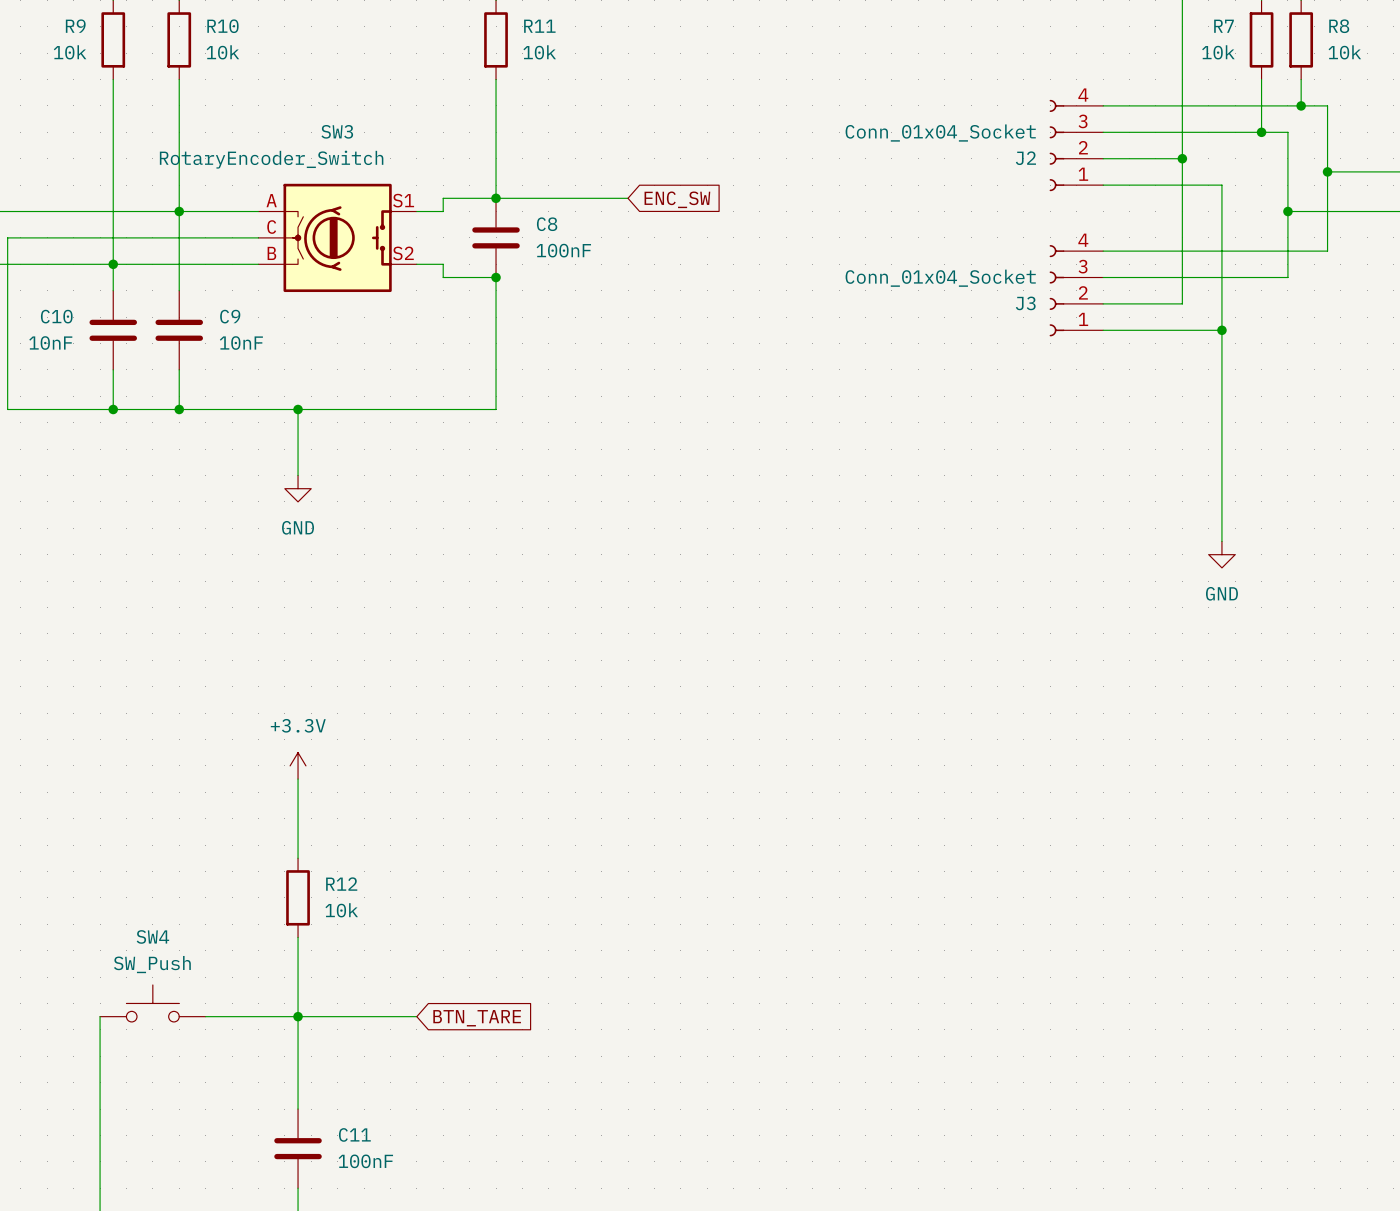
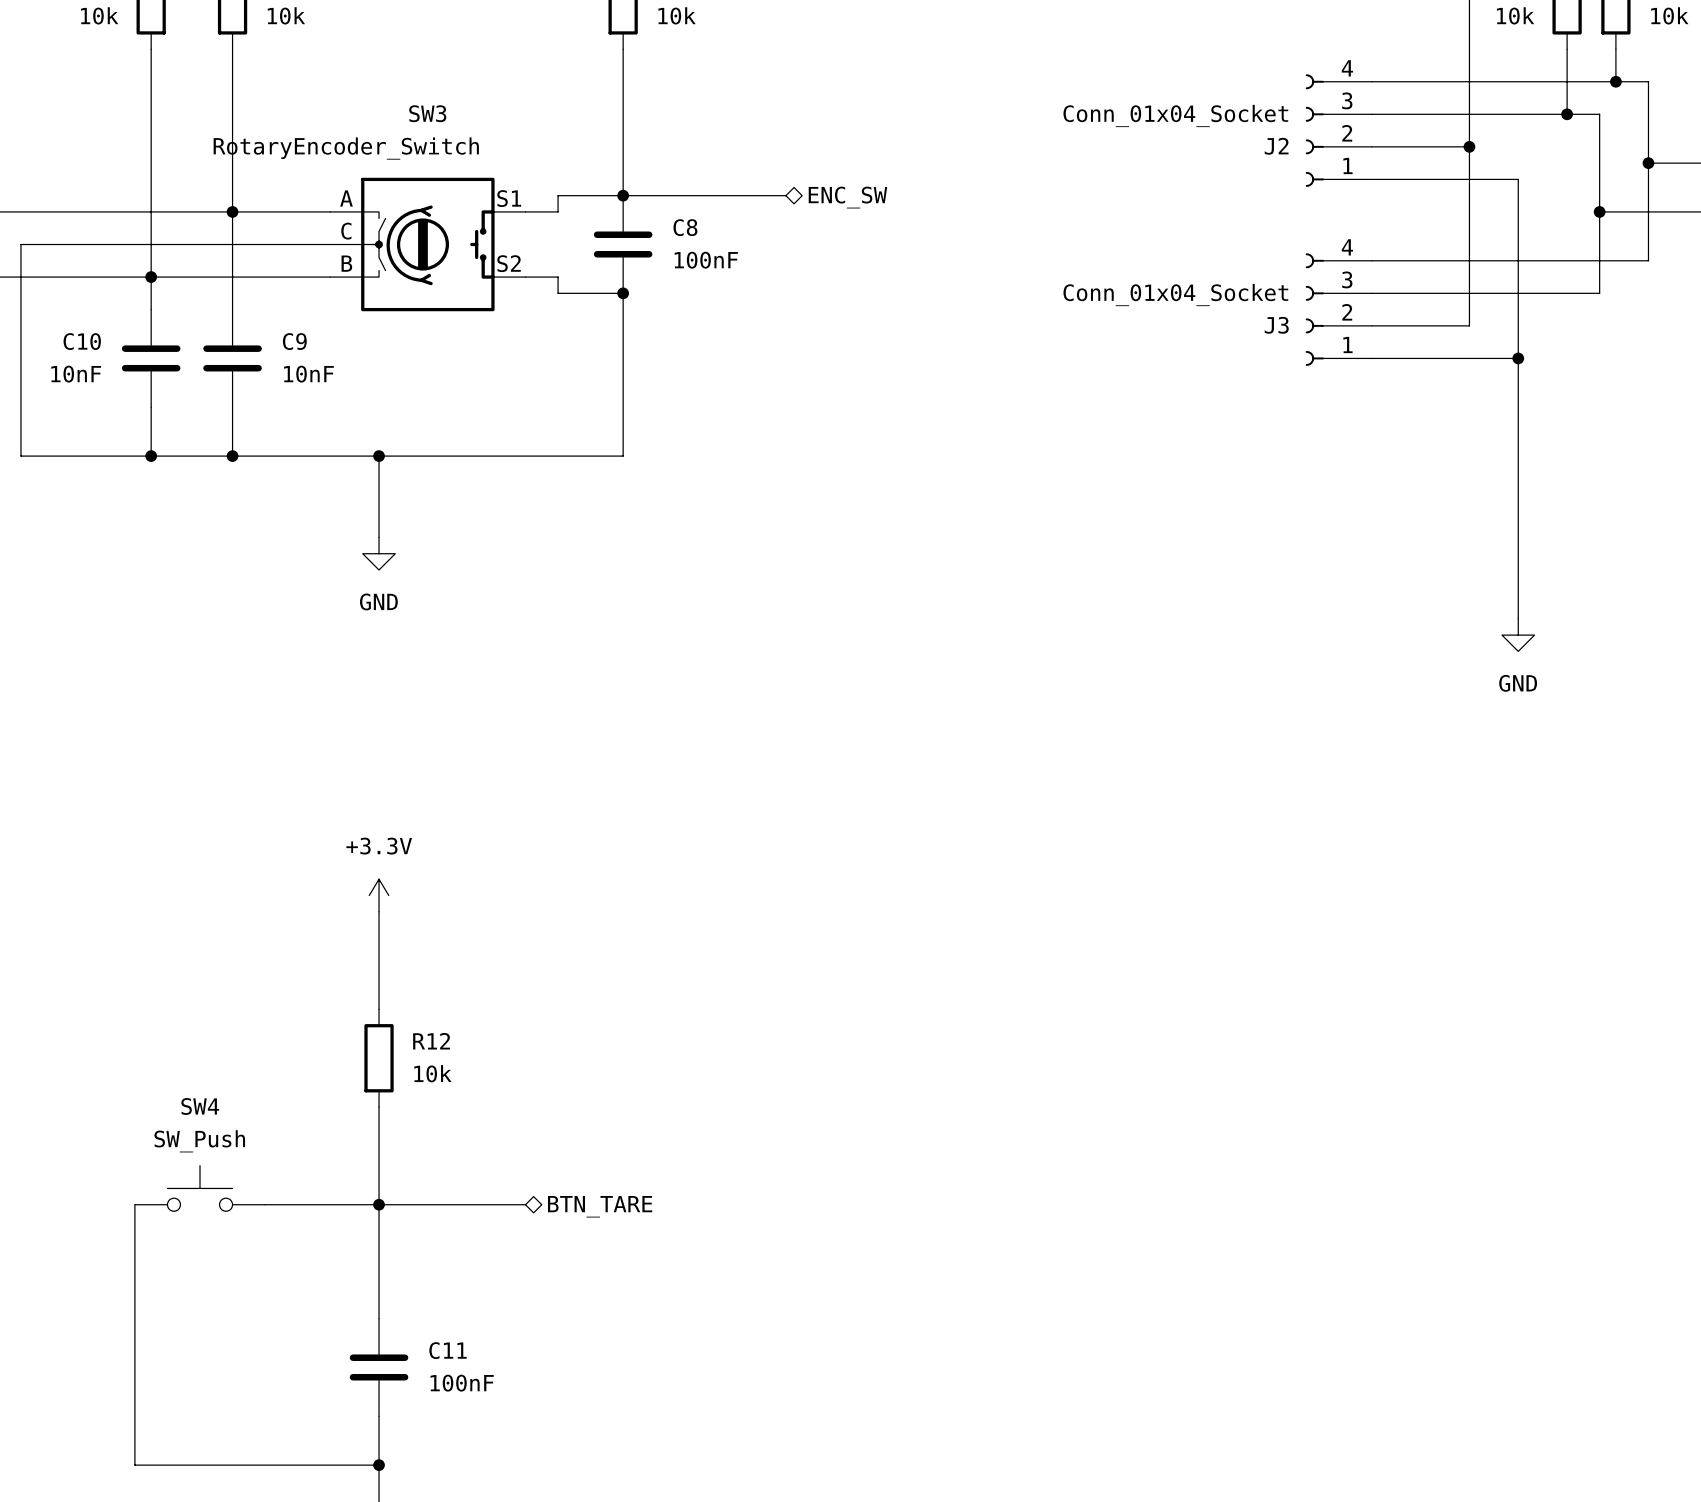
global label: ENC_SW (677, 199) -> none
hierarchical label: none -> ENC_SW (847, 197)
hierarchical label: none -> BTN_TARE (600, 1206)
global label: BTN_TARE (477, 1018) -> none

